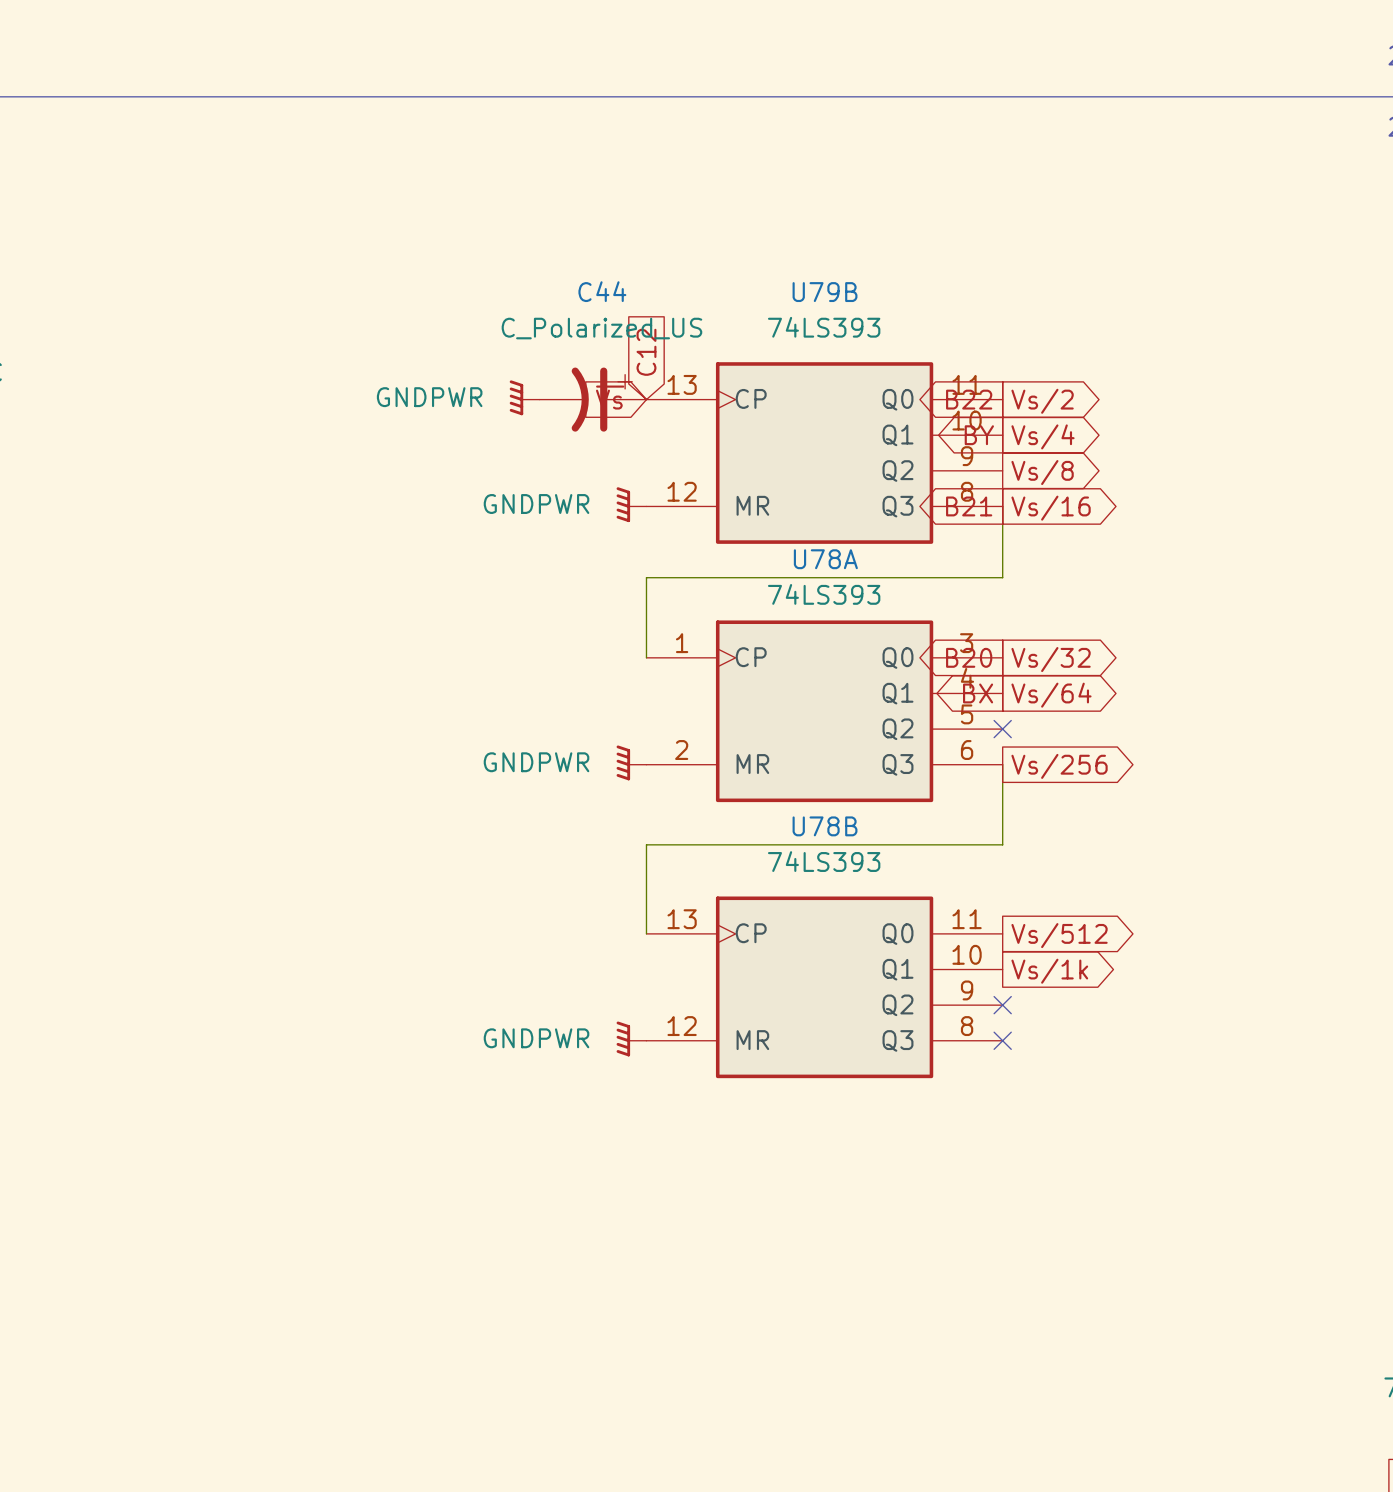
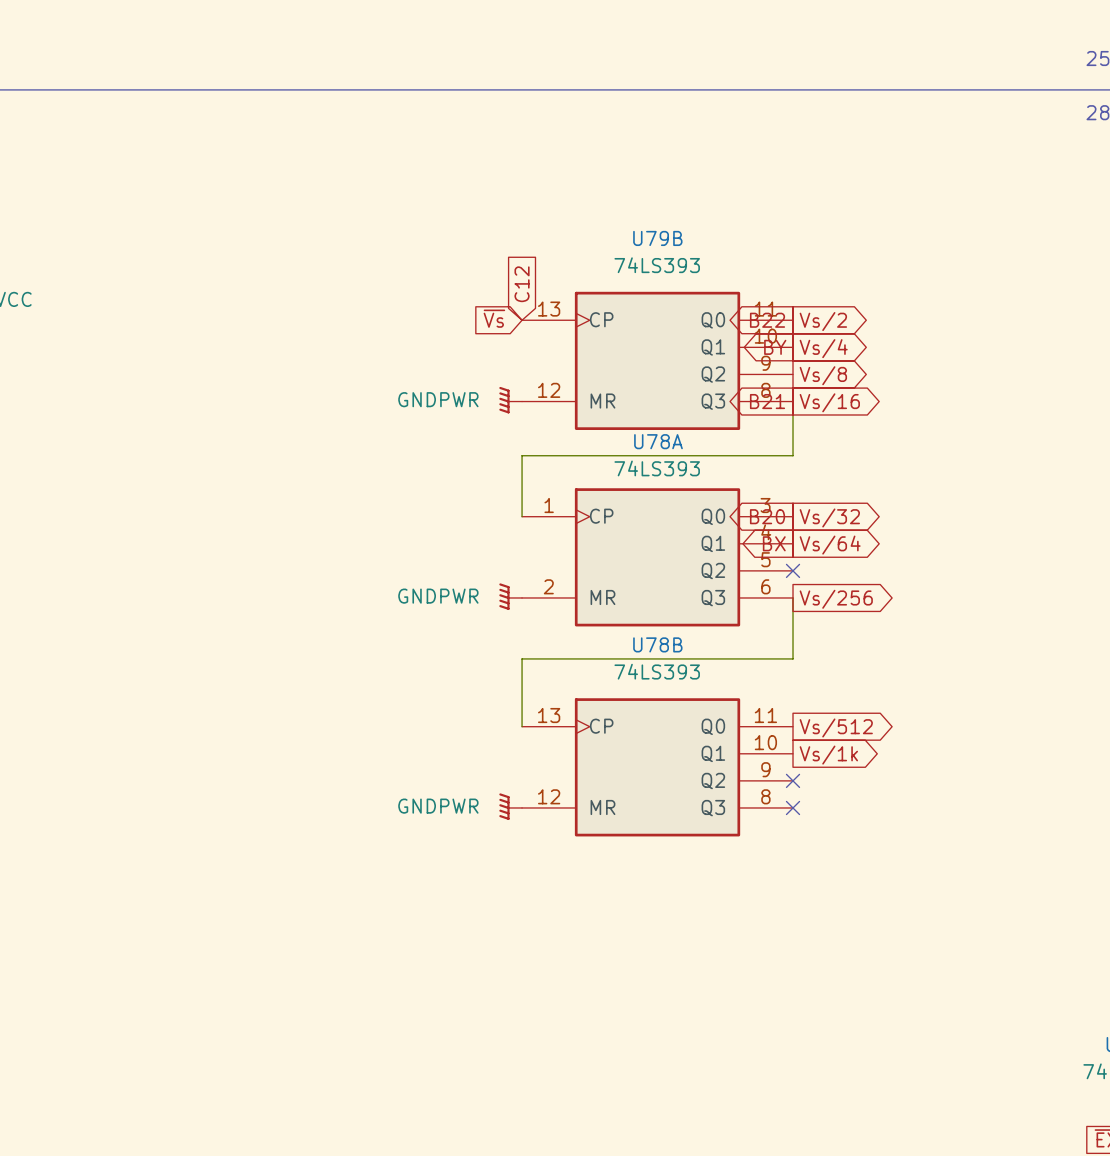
power symbol: GNDPWR (524, 397) -> none
C44: C_Polarized_US (593, 399) -> none

